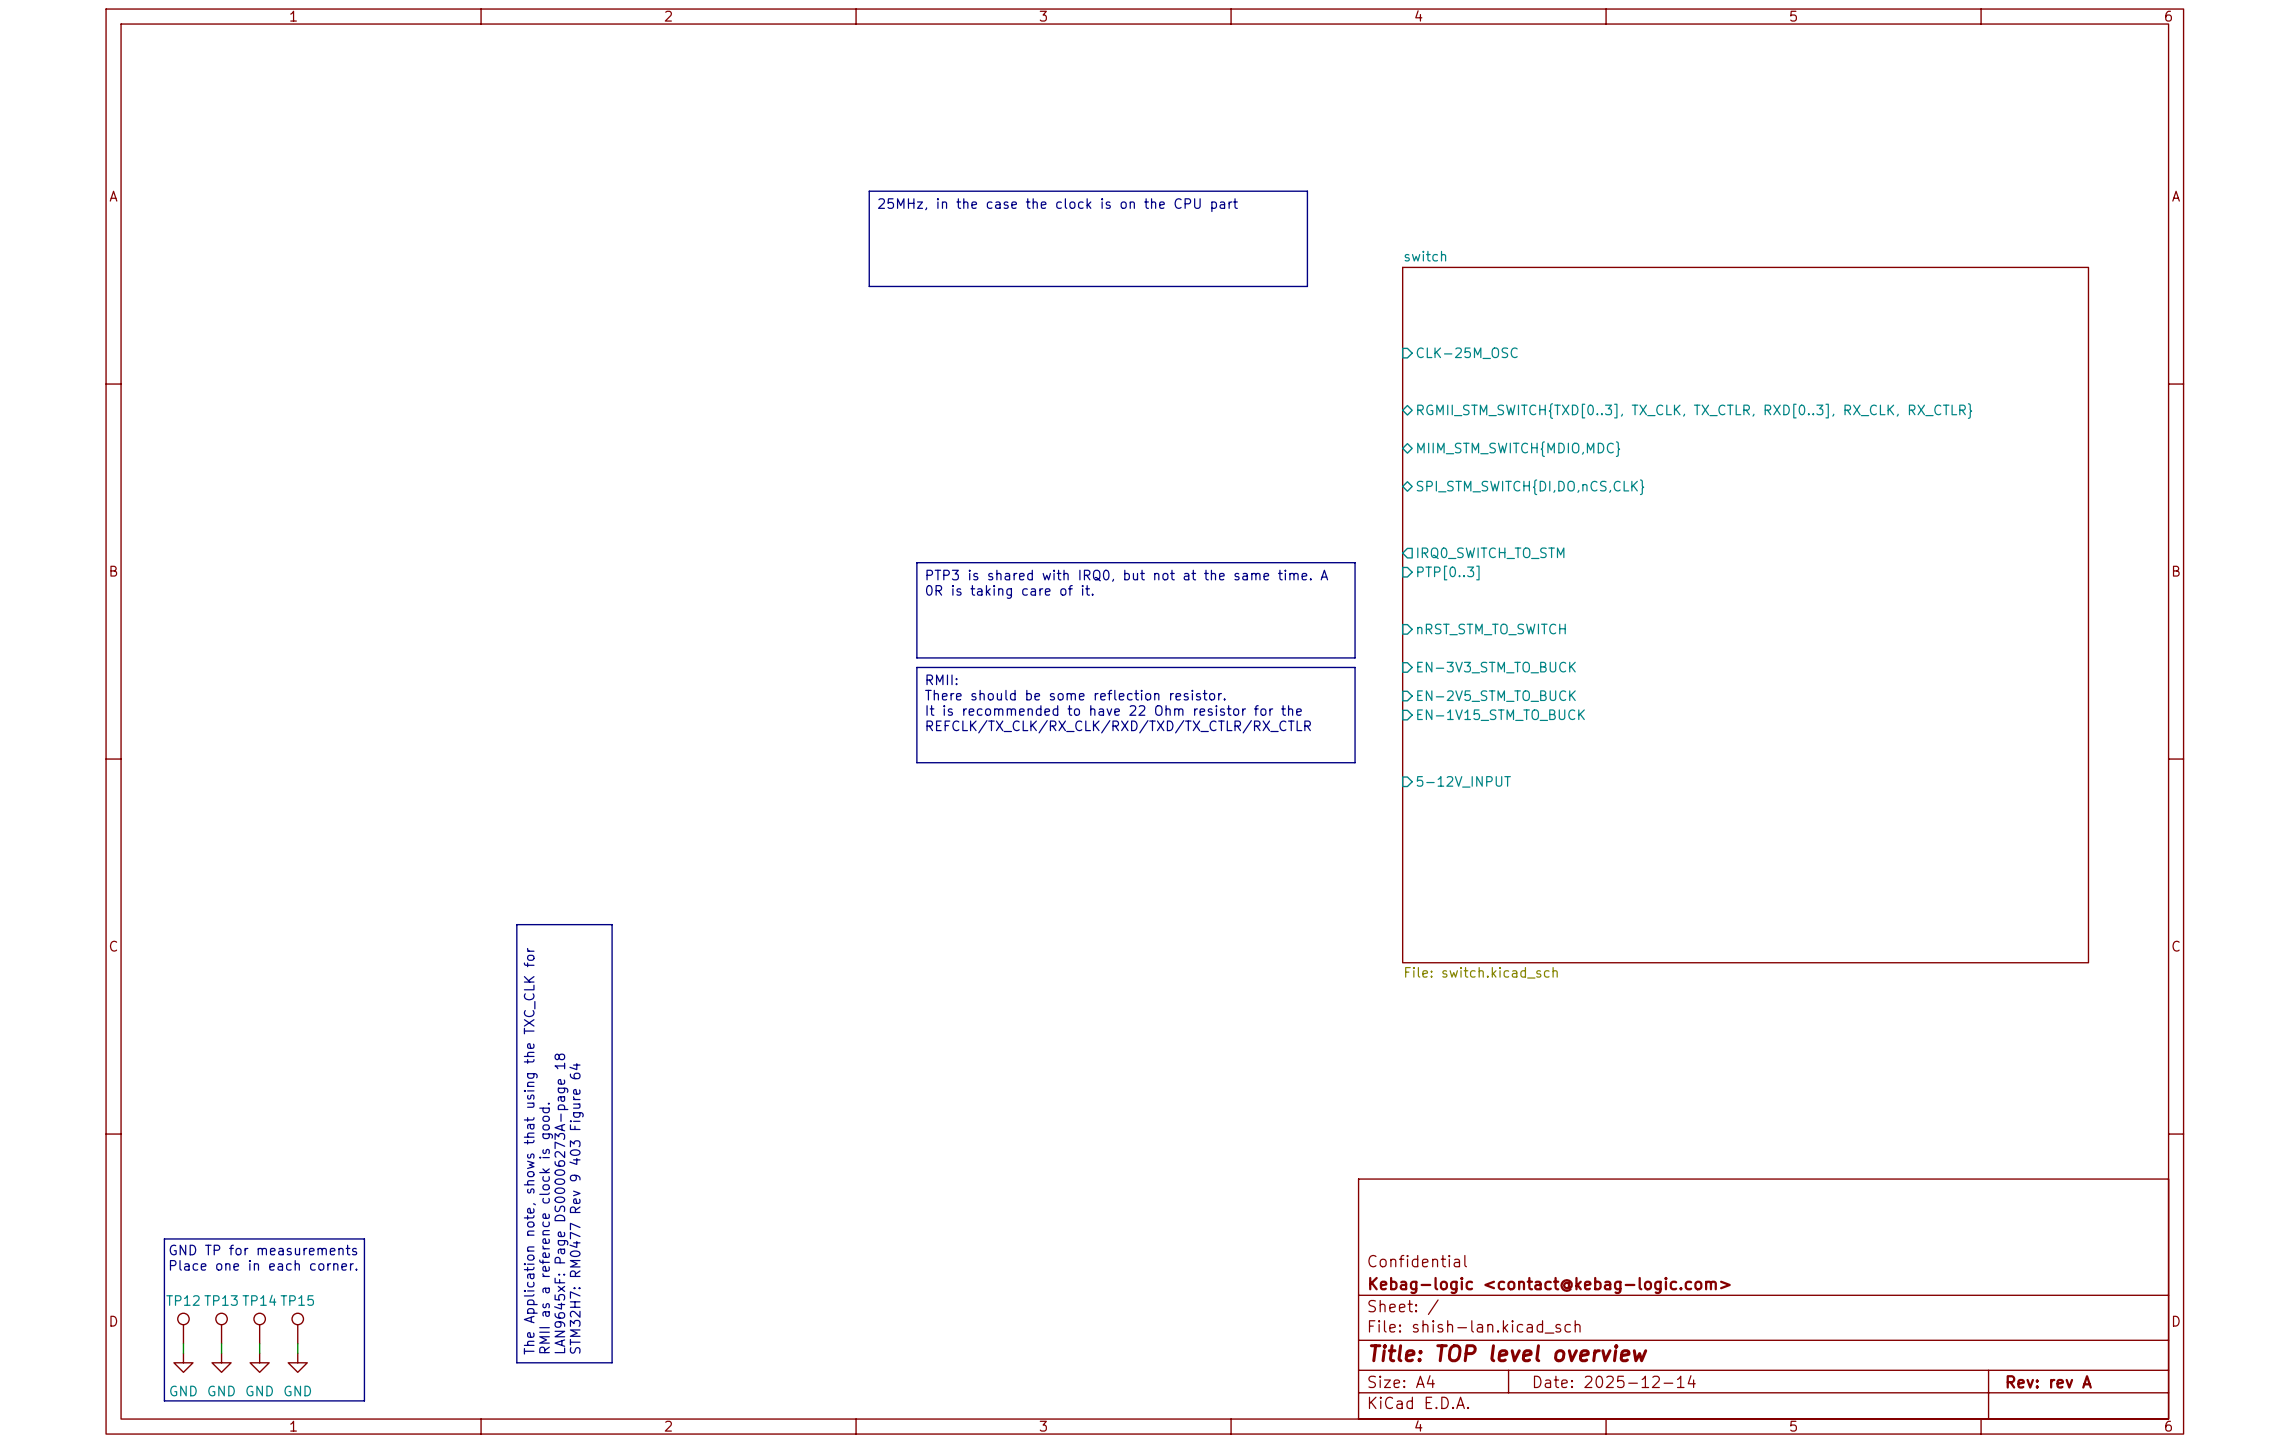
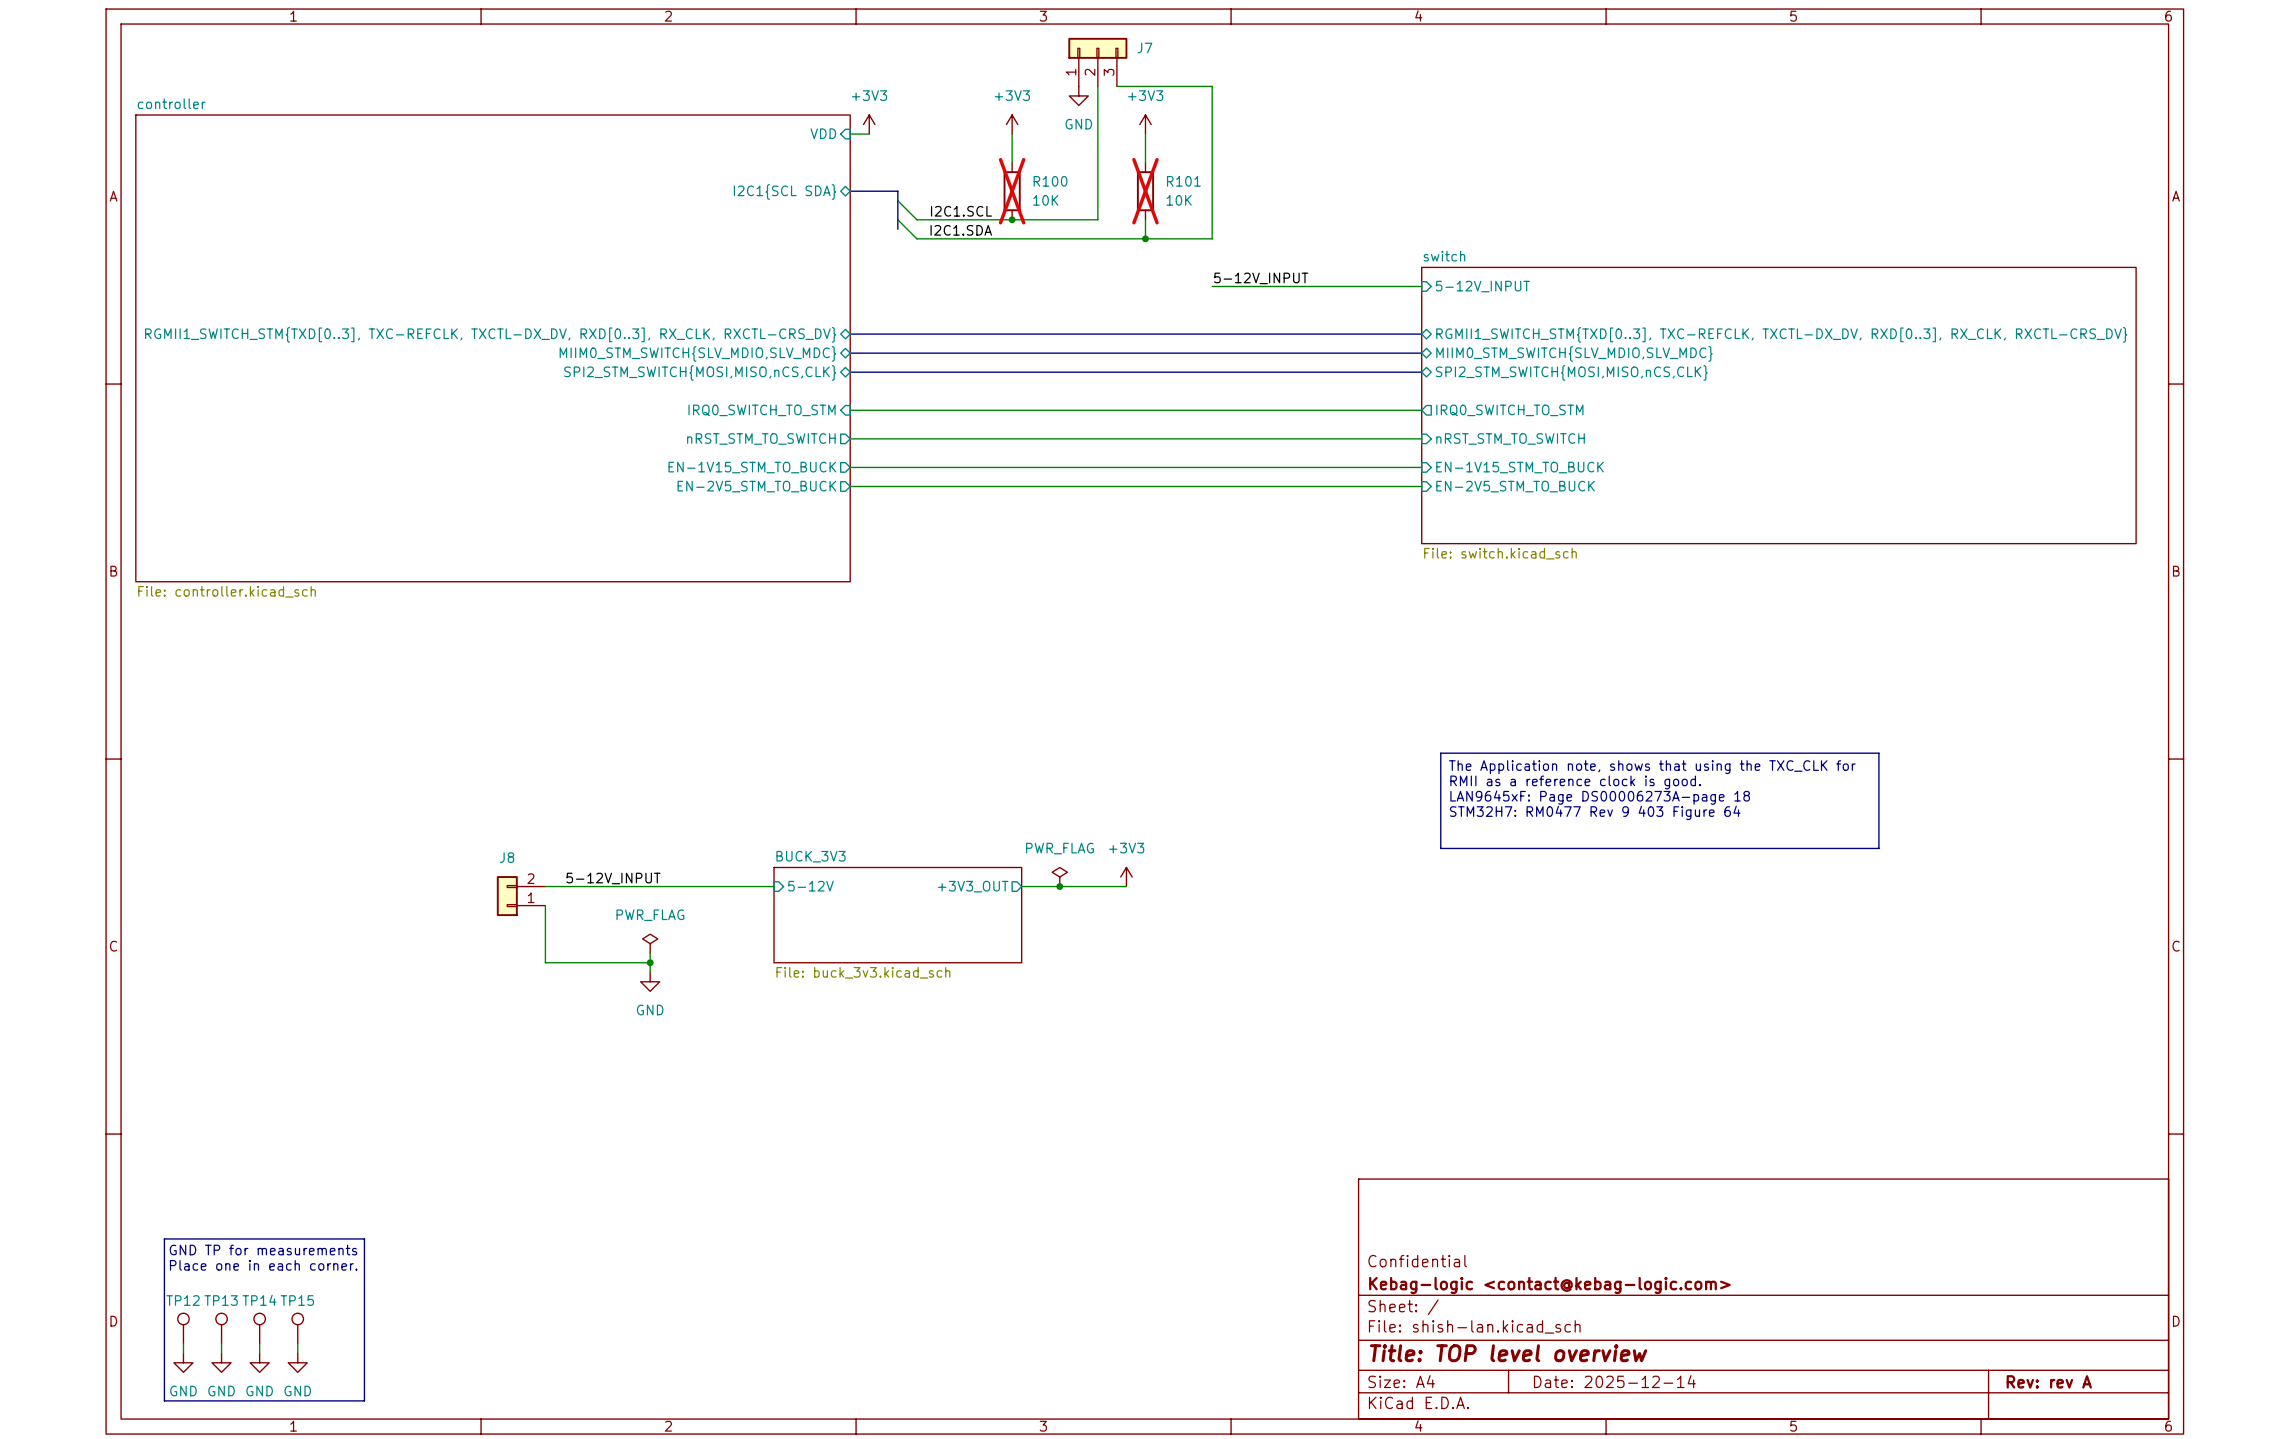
J7: none -> (1097, 62)
wire: none -> (1097, 86) (1097, 219) (916, 219) (897, 200)
wire: none -> (1116, 86) (1212, 86) (1212, 238) (916, 238) (897, 219)
power symbol: none -> GND (1078, 95)
power symbol: none -> +3V3 (869, 124)
power symbol: none -> +3V3 (1012, 124)
power symbol: none -> +3V3 (1145, 124)
sheet pin: none -> VDD (823, 133)
wire: none -> (850, 134) (869, 134)
wire: none -> (1012, 134) (1012, 162)
wire: none -> (1145, 134) (1145, 162)
sheet pin: none -> I2C1{SCL SDA} (784, 191)
bus: none -> (850, 191) (897, 191) (897, 229)
line: (869, 191) (1307, 191) (1307, 286) (869, 286) (869, 191) -> none
R100: none -> 10K (1012, 191)
R101: none -> 10K (1145, 191)
text: 25MHz, in the case the clock is on the CPU part (1057, 205) -> none
label: none -> I2C1.SCL (961, 211)
junction: none -> (1012, 219)
wire: none -> (1145, 219) (1145, 238)
label: none -> I2C1.SDA (961, 230)
junction: none -> (1145, 238)
label: none -> 5-12V_INPUT (1261, 278)
wire: none -> (1212, 286) (1421, 286)
sheet pin: none -> 5-12V_INPUT (1482, 286)
sheet pin: none -> RGMII1_SWITCH_STM{TXD[0..3], TXC-REFCLK, TXCTL-DX_DV, RXD[0..3], RX_CLK, RXCTL-CRS_DV} (490, 334)
bus: none -> (850, 334) (1421, 334)
sheet pin: none -> RGMII1_SWITCH_STM{TXD[0..3], TXC-REFCLK, TXCTL-DX_DV, RXD[0..3], RX_CLK, RXCTL-CRS_DV} (1781, 334)
sheet controller: none -> File: controller.kicad_sch (493, 348)
sheet pin: none -> MIIM0_STM_SWITCH{SLV_MDIO,SLV_MDC} (697, 353)
bus: none -> (850, 353) (1421, 353)
sheet pin: CLK-25M_OSC (1467, 353) -> none
sheet pin: none -> MIIM0_STM_SWITCH{SLV_MDIO,SLV_MDC} (1574, 353)
sheet pin: none -> SPI2_STM_SWITCH{MOSI,MISO,nCS,CLK} (700, 372)
bus: none -> (850, 372) (1421, 372)
sheet pin: none -> SPI2_STM_SWITCH{MOSI,MISO,nCS,CLK} (1571, 372)
sheet switch: none -> File: switch.kicad_sch (1778, 405)
sheet pin: none -> IRQ0_SWITCH_TO_STM (762, 410)
wire: none -> (850, 410) (1421, 410)
sheet pin: RGMII_STM_SWITCH{TXD[0..3], TX_CLK, TX_CTLR, RXD[0..3], RX_CLK, RX_CTLR} (1694, 411) -> none
sheet pin: none -> nRST_STM_TO_SWITCH (761, 438)
wire: none -> (850, 438) (1421, 438)
sheet pin: none -> nRST_STM_TO_SWITCH (1510, 438)
sheet pin: MIIM_STM_SWITCH{MDIO,MDC} (1518, 449) -> none
sheet pin: none -> EN-1V15_STM_TO_BUCK (752, 467)
wire: none -> (850, 467) (1421, 467)
sheet pin: none -> EN-1V15_STM_TO_BUCK (1520, 467)
sheet pin: none -> EN-2V5_STM_TO_BUCK (756, 486)
wire: none -> (850, 486) (1421, 486)
sheet pin: none -> EN-2V5_STM_TO_BUCK (1515, 486)
sheet pin: SPI_STM_SWITCH{DI,DO,nCS,CLK} (1530, 487) -> none
sheet pin position: IRQ0_SWITCH_TO_STM (1490, 553) -> IRQ0_SWITCH_TO_STM (1509, 410)
line: (916, 562) (916, 657) (1355, 657) (1355, 562) (916, 562) -> none
sheet pin: PTP[0..3] (1448, 572) -> none
text: PTP3 is shared with IRQ0, but not at the same time. A (1127, 575) -> none
text: 0R is taking care of it. (1009, 591) -> none
sheet switch: File: switch.kicad_sch (1745, 615) -> none
sheet pin: nRST_STM_TO_SWITCH (1491, 629) -> none
line: (916, 667) (1355, 667) (1355, 762) (916, 762) (916, 667) -> none
sheet pin: EN-3V3_STM_TO_BUCK (1496, 667) -> none
text: RMII: (942, 679) -> none
text: There should be some reflection resistor. (1075, 695) -> none
sheet pin: EN-2V5_STM_TO_BUCK (1496, 696) -> none
text: It is recommended to have 22 Ohm resistor for the (1114, 710) -> none
sheet pin: EN-1V15_STM_TO_BUCK (1501, 715) -> none
text: REFCLK/TX_CLK/RX_CLK/RXD/TXD/TX_CTLR/RX_CTLR (1118, 726) -> none
line: none -> (1440, 753) (1878, 753) (1878, 848) (1440, 848) (1440, 753)
text: none -> The Application note, shows that using the TXC_CLK for (1652, 767)
sheet pin: 5-12V_INPUT (1463, 781) -> none
text: none -> RMII as a reference clock is good. (1575, 782)
text: none -> LAN9645xF: Page DS00006273A-page 18 (1600, 797)
text: none -> STM32H7: RM0477 Rev 9 403 Figure 64 (1595, 812)
power symbol: none -> PWR_FLAG (1059, 877)
power symbol: none -> +3V3 (1126, 877)
label: none -> 5-12V_INPUT (613, 878)
wire: none -> (545, 886) (774, 886)
sheet pin: none -> 5-12V (810, 886)
sheet pin: none -> +3V3_OUT (973, 886)
wire: none -> (1021, 886) (1126, 886)
junction: none -> (1059, 886)
J8: none -> (521, 896)
wire: none -> (545, 905) (545, 962) (650, 962)
sheet BUCK_3V3: none -> File: buck_3v3.kicad_sch (897, 915)
line: (516, 924) (612, 924) (612, 1362) (516, 1362) (516, 924) -> none
power symbol: none -> PWR_FLAG (650, 943)
wire: none -> (650, 953) (650, 972)
junction: none -> (650, 962)
power symbol: none -> GND (650, 981)
text: The Application note, shows that using the TXC_CLK for (530, 1151) -> none
text: LAN9645xF: Page DS00006273A-page 18 (561, 1203) -> none
text: STM32H7: RM0477 Rev 9 403 Figure 64 (576, 1208) -> none
text: RMII as a reference clock is good. (546, 1227) -> none

